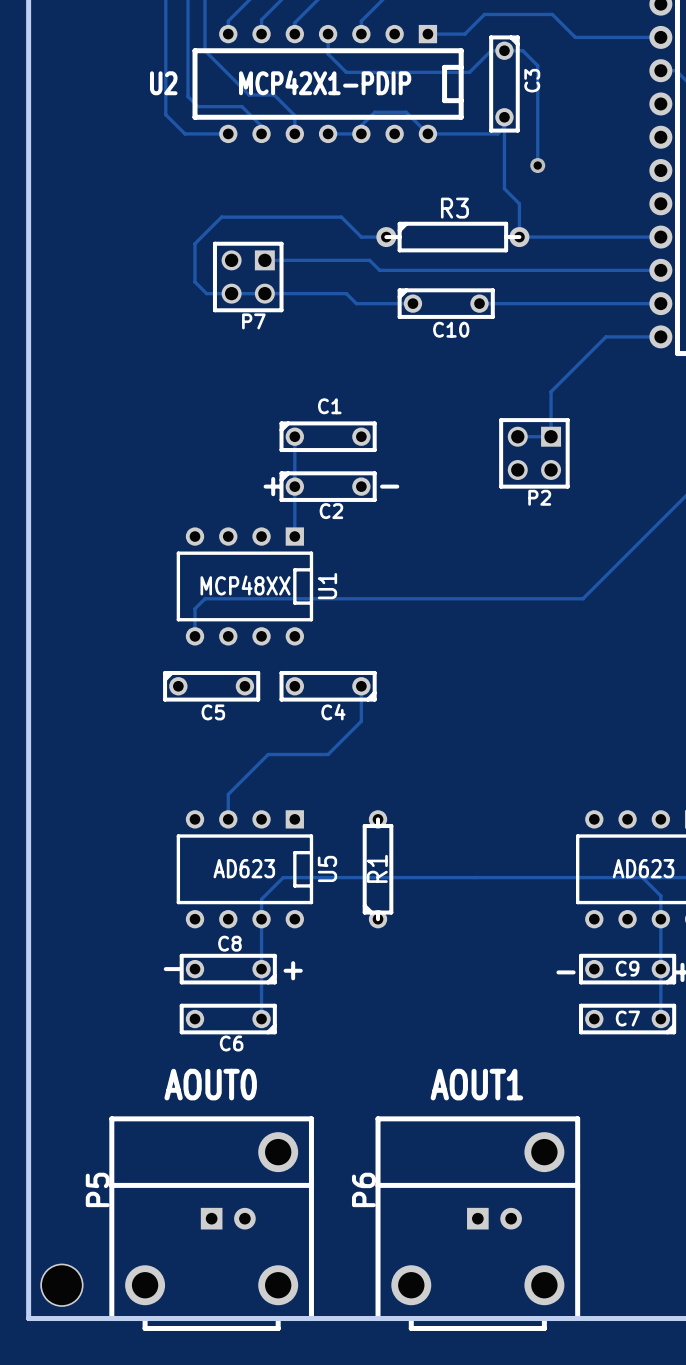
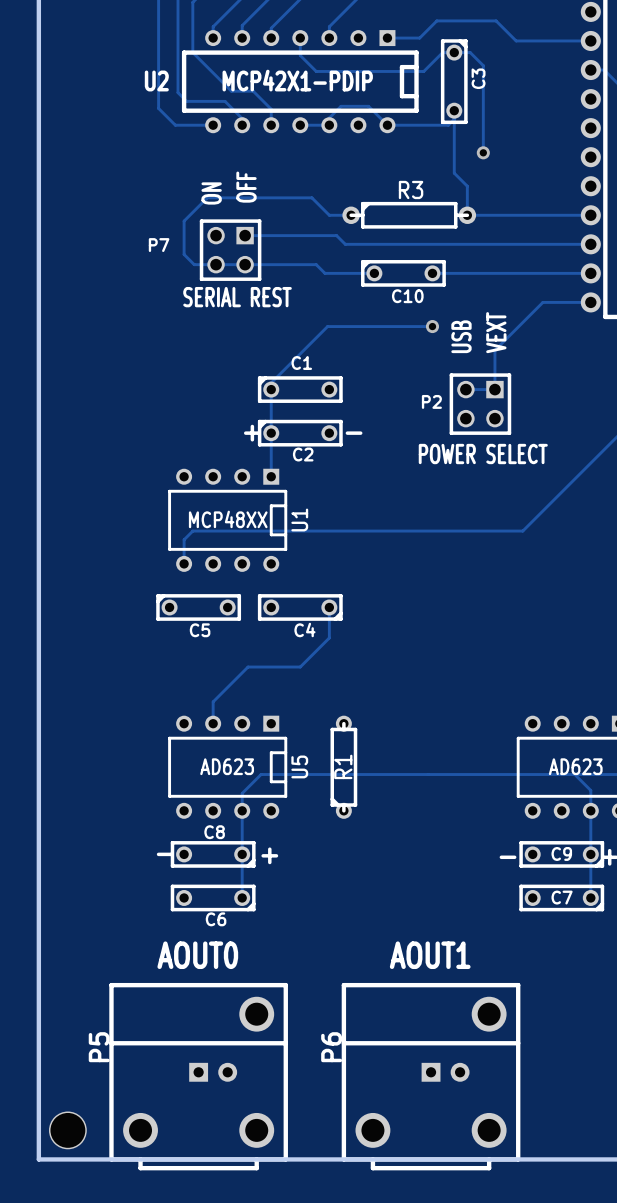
text: none -> OFF (246, 187)
text: none -> ON (211, 193)
P7 name position: P7 (253, 321) -> P7 (159, 245)
text: none -> SERIAL REST (237, 297)
track: none -> (432, 326) (327, 326) (271, 382) (271, 389)
via: none -> (432, 326)
text: none -> VEXT (496, 332)
text: none -> USB (461, 336)
P2 name position: P2 (539, 497) -> P2 (431, 401)
text: none -> POWER SELECT (483, 454)

